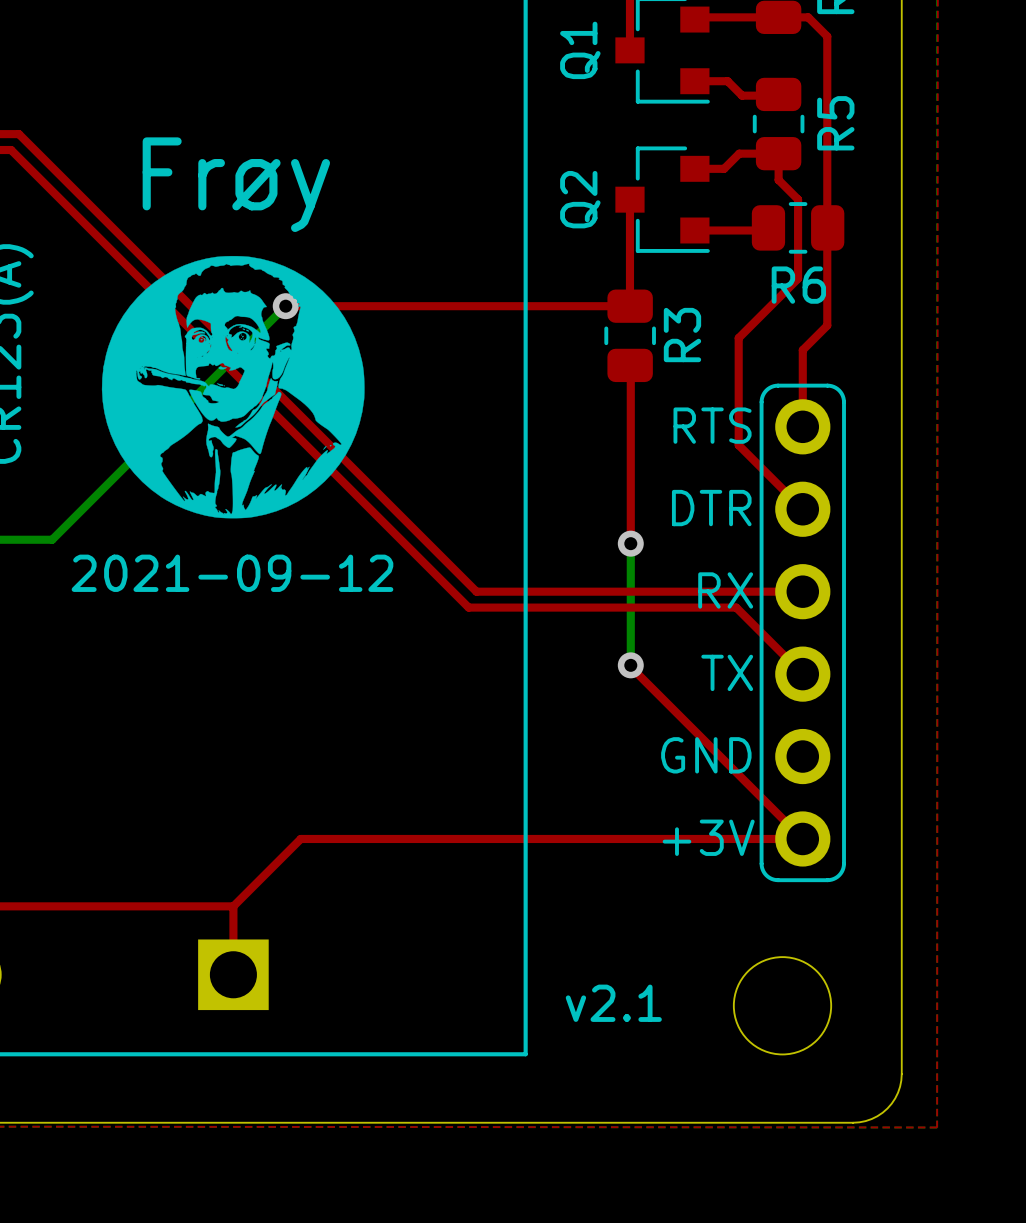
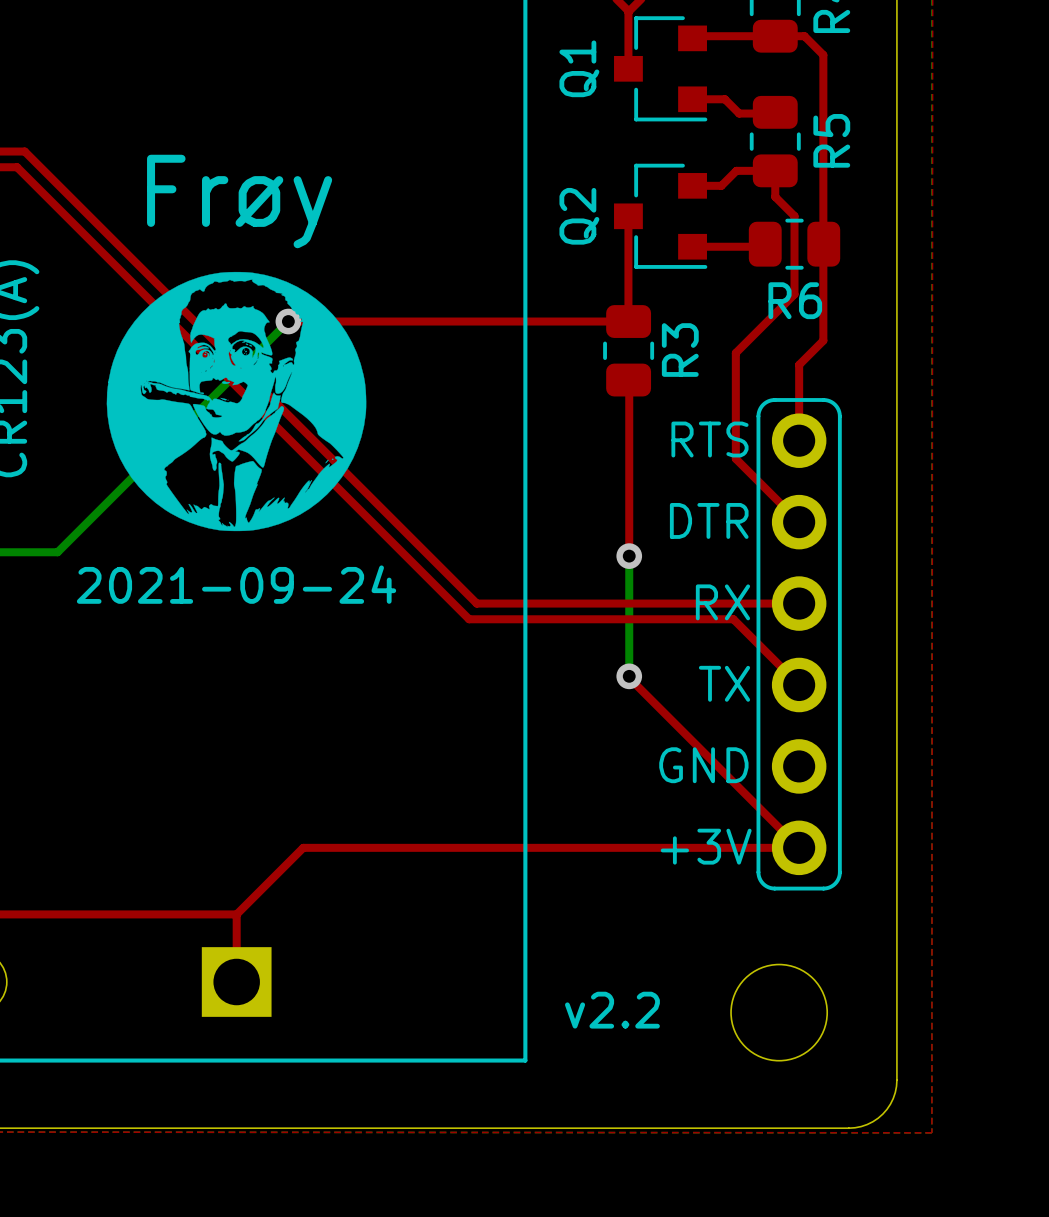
text: 2021-09-12 (232, 573) -> 2021-09-24 (236, 584)
text: v2.1 (613, 1003) -> v2.2 (612, 1010)

